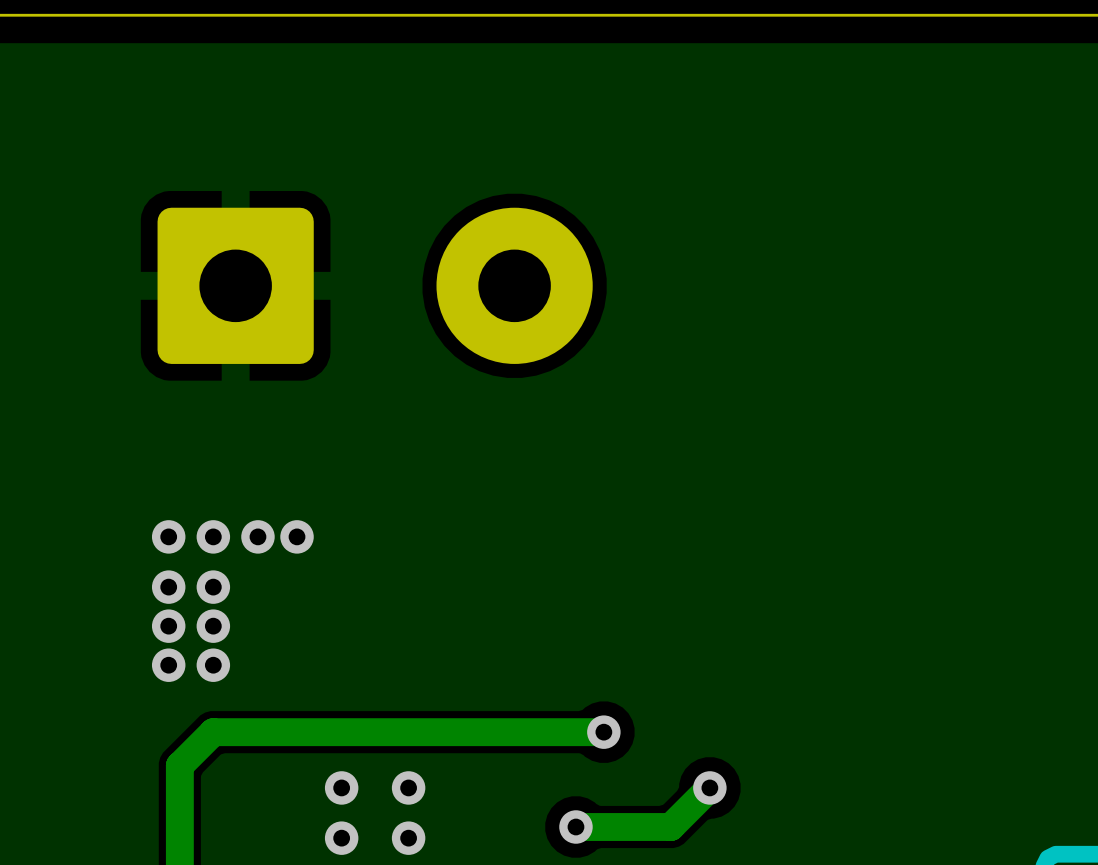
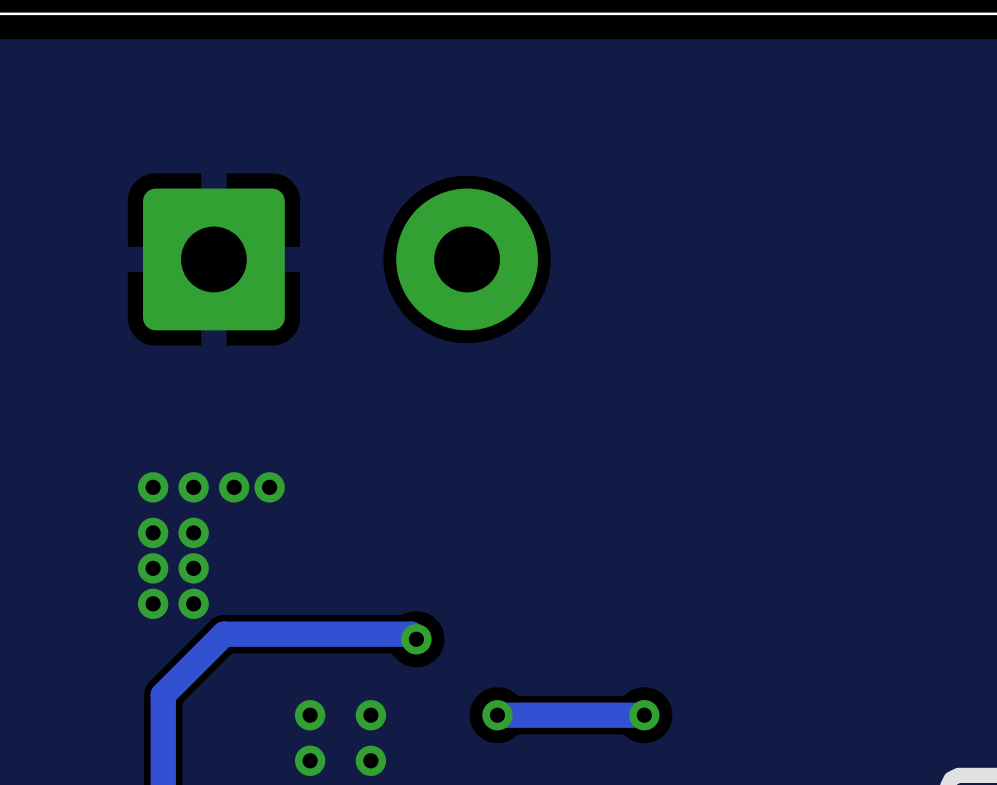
via: none -> (416, 639)
track: (603, 732) (213, 732) -> (416, 639) (411, 634) (224, 634) (193, 664)
via: (603, 732) -> none
via: none -> (497, 715)
track: (709, 787) (670, 827) (575, 827) -> (644, 715) (497, 715)
via: (575, 827) -> none

